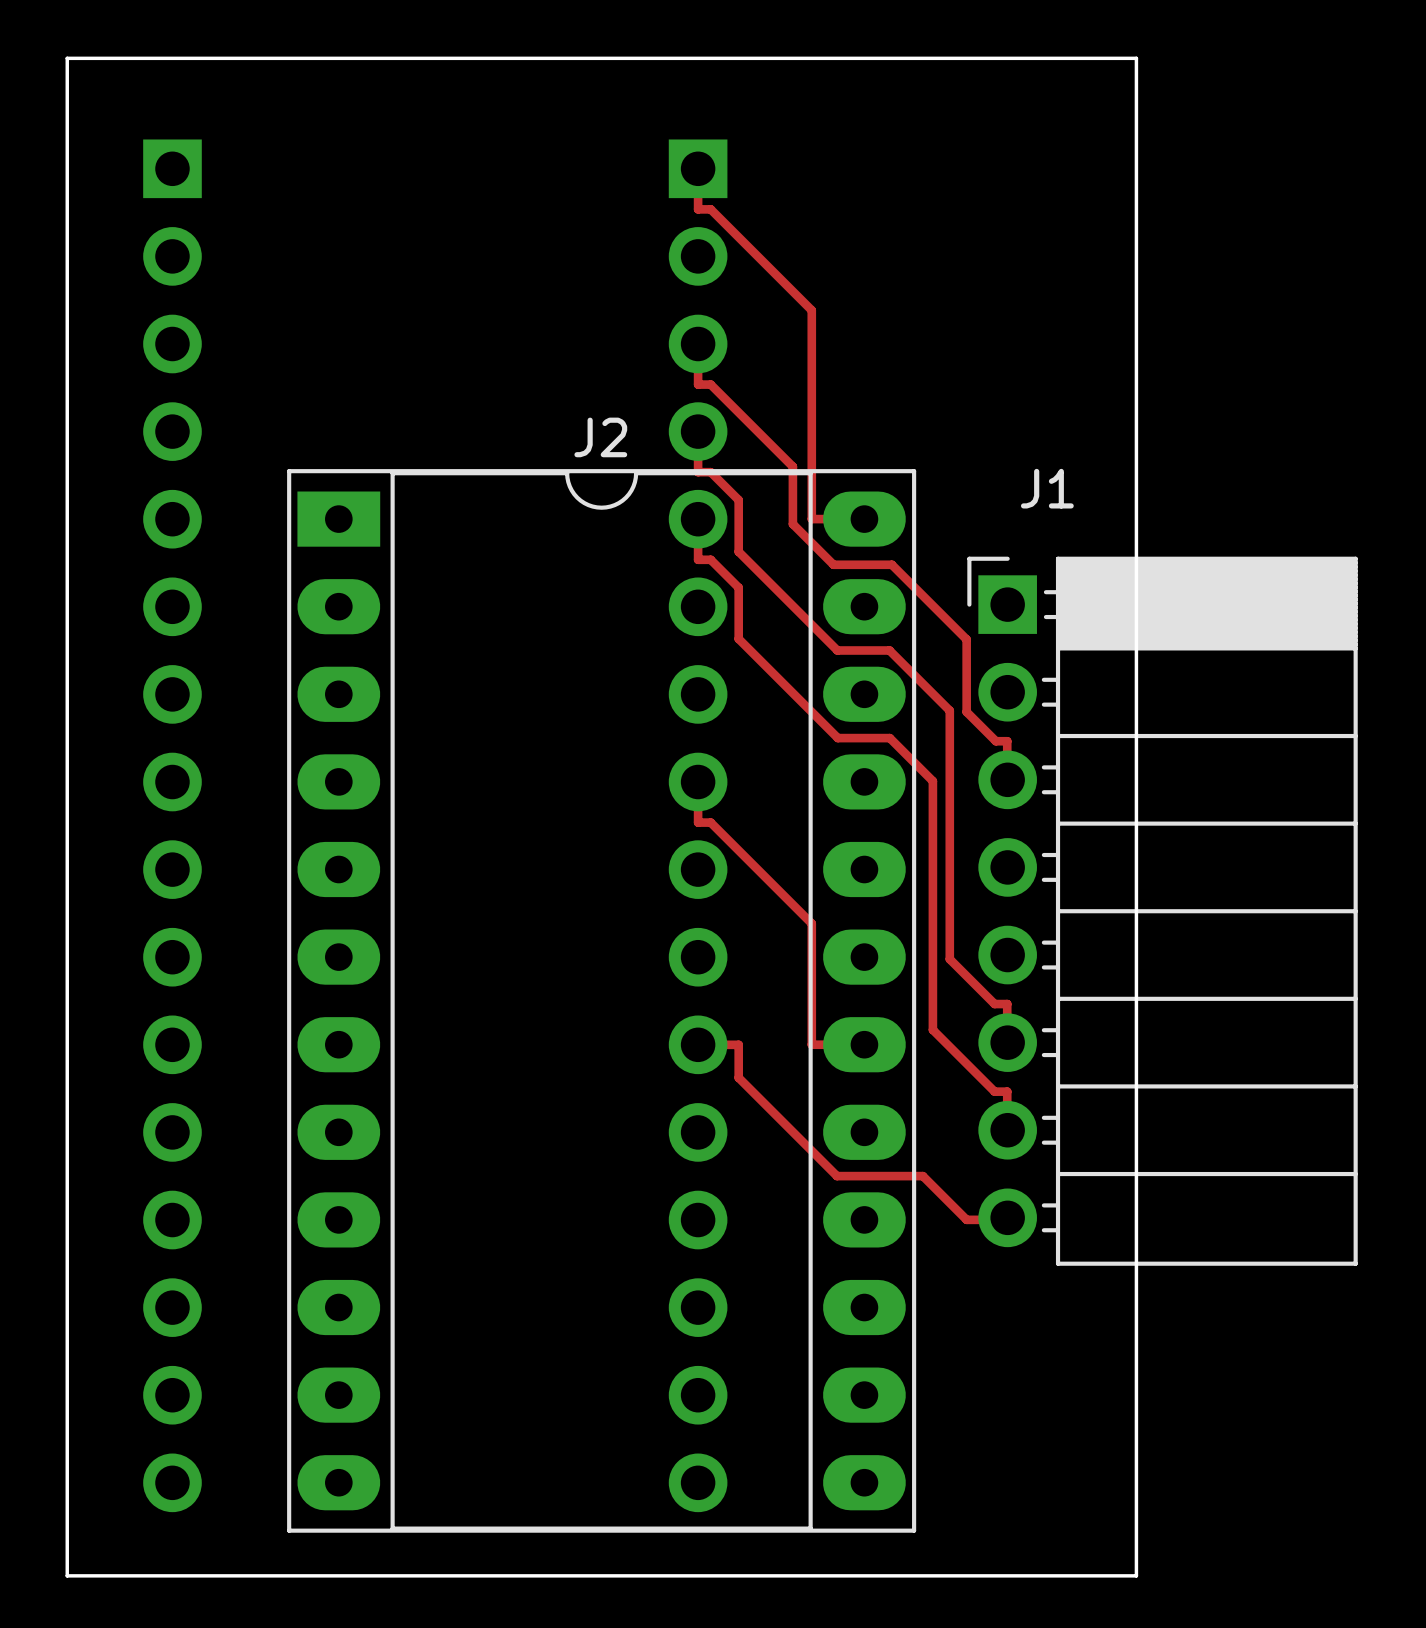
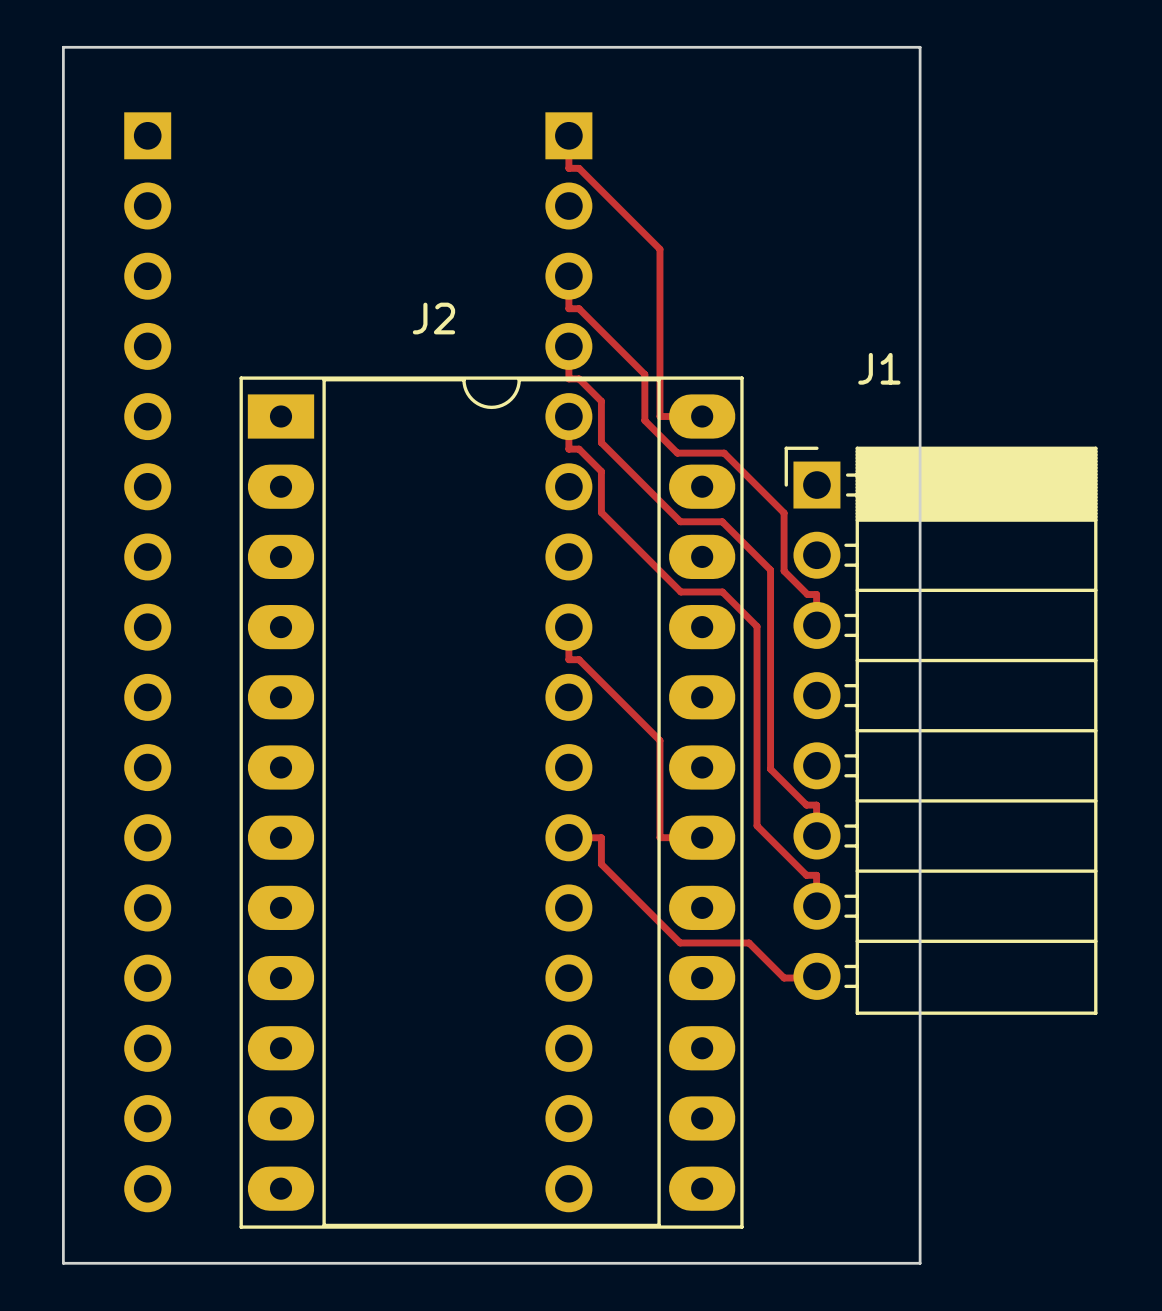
J2 name position: J2 (600, 437) -> J2 (433, 318)
J1 name position: J1 (1047, 488) -> J1 (879, 368)

